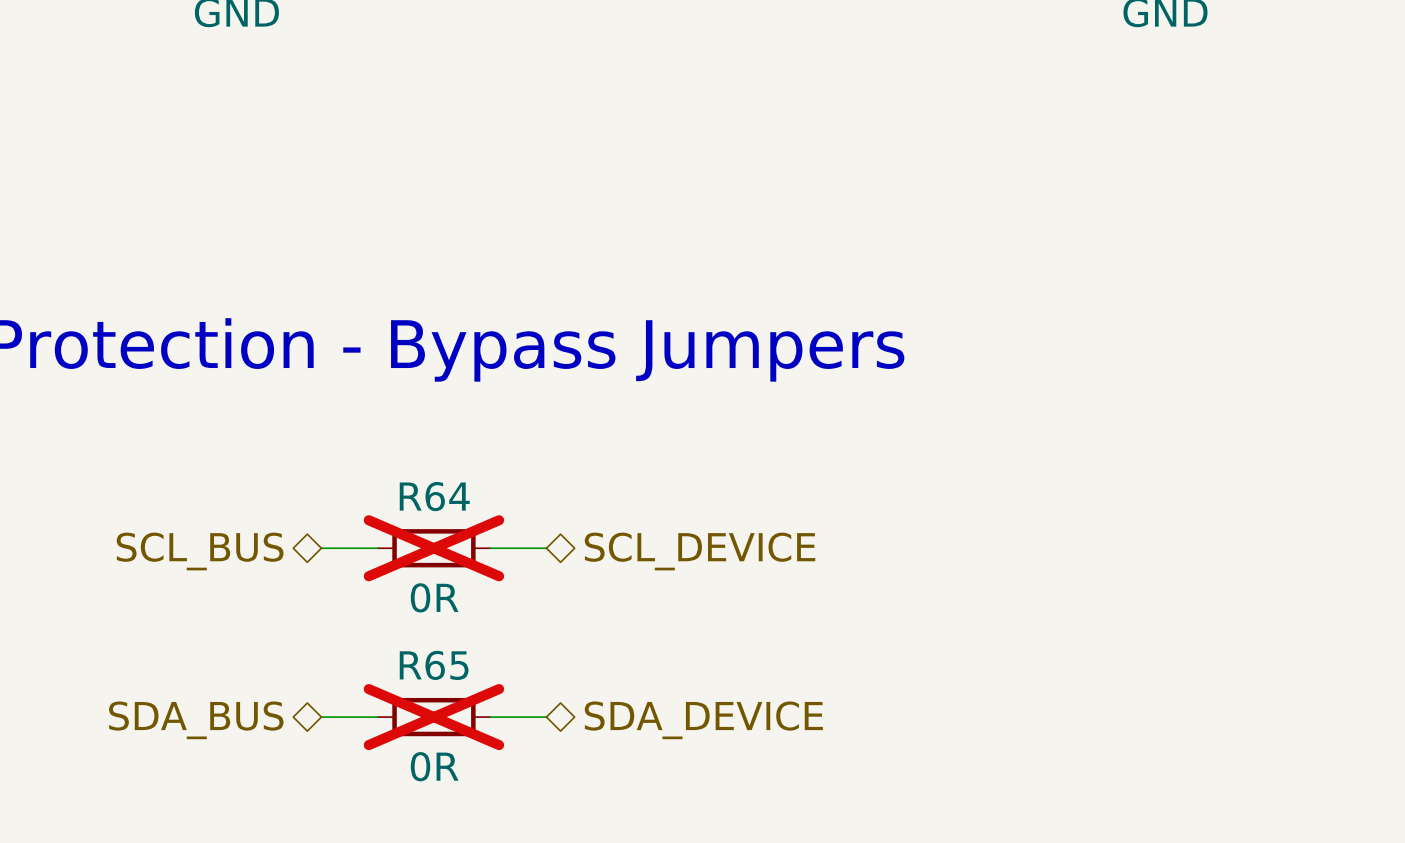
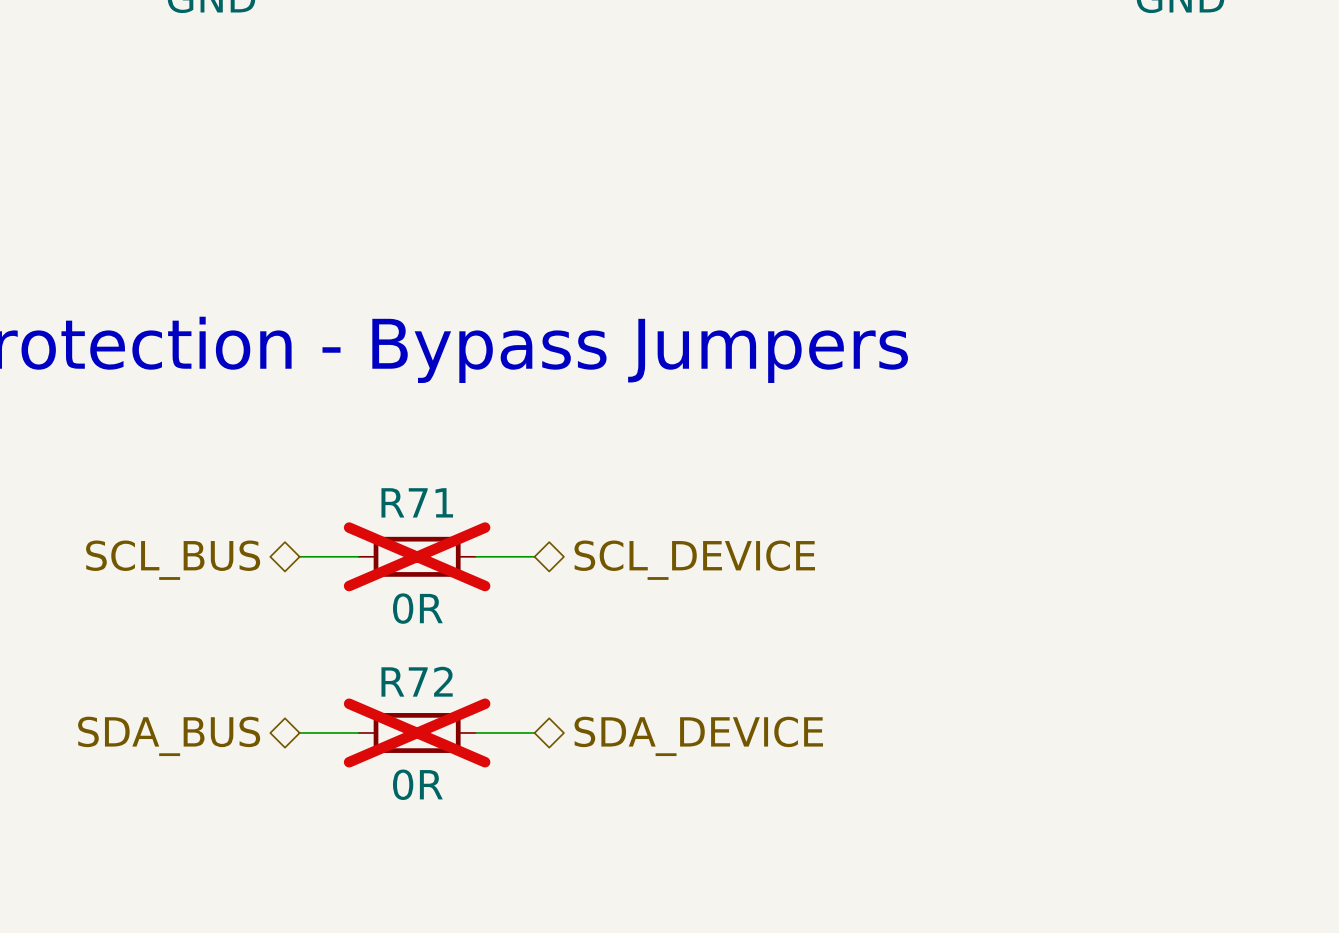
R64 name: R64 (434, 496) -> R71 (417, 502)
R65 name: R65 (434, 665) -> R72 (417, 681)

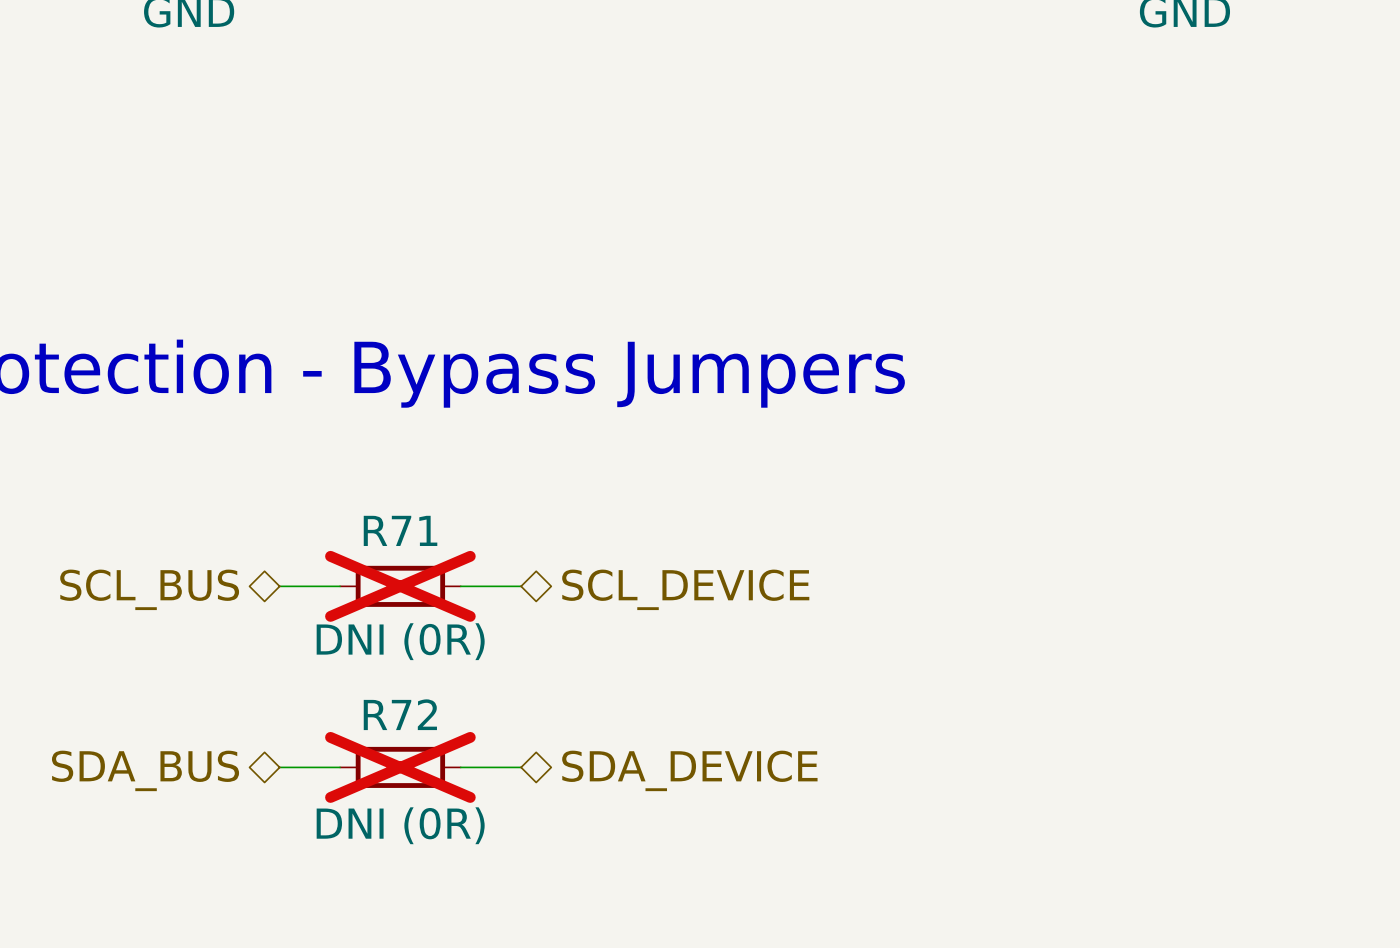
R71 value: 0R (417, 608) -> DNI (0R) (400, 641)
R72 value: 0R (417, 784) -> DNI (0R) (400, 825)

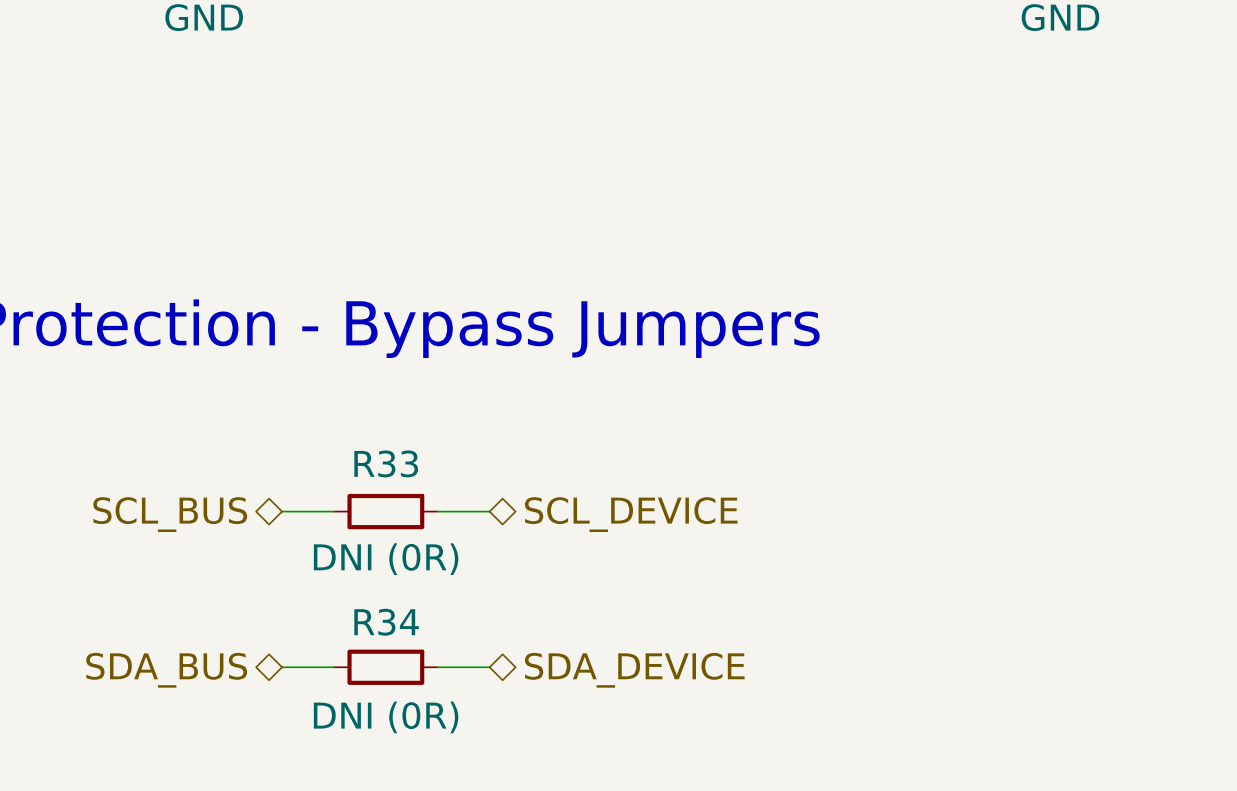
R71 name: R71 (400, 530) -> R33 (386, 463)
R71 do-not-place cross: (400, 586) -> none
R72 name: R72 (400, 714) -> R34 (386, 622)
R72 do-not-place cross: (400, 767) -> none

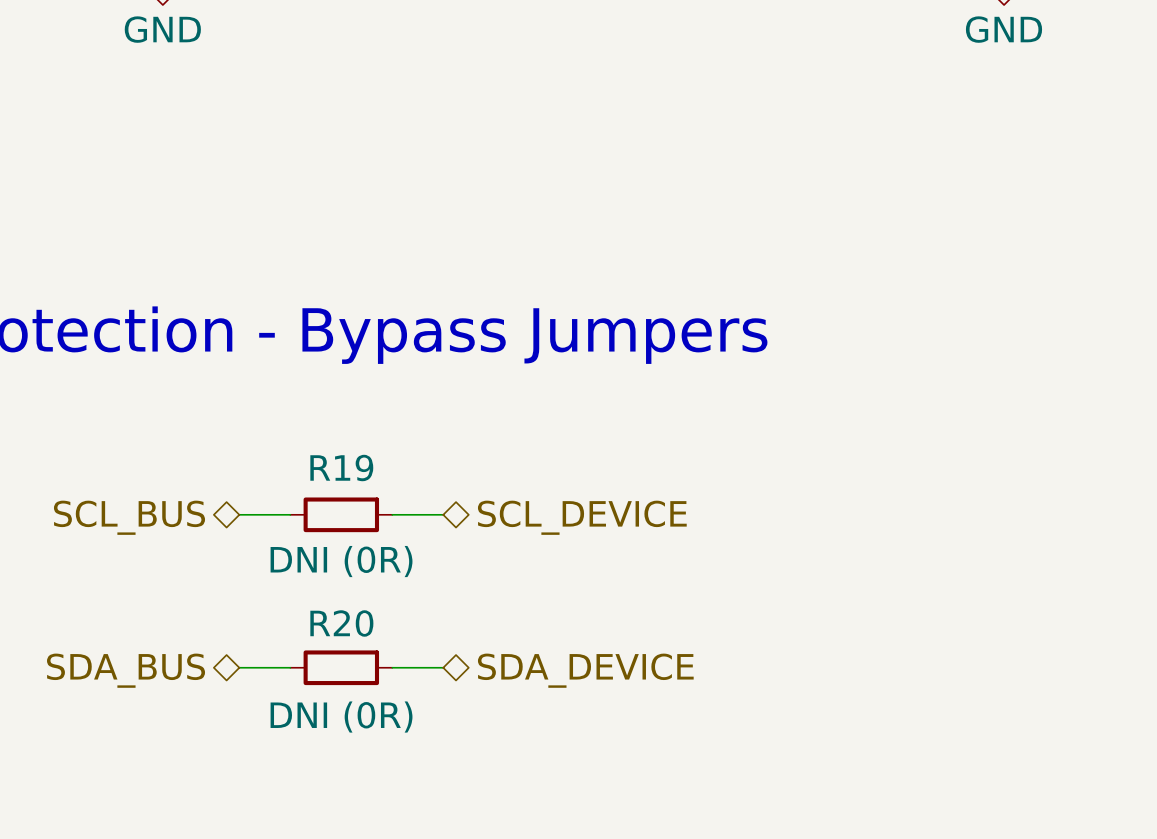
R33 name: R33 (386, 463) -> R19 (341, 468)
R34 name: R34 (386, 622) -> R20 (341, 623)

